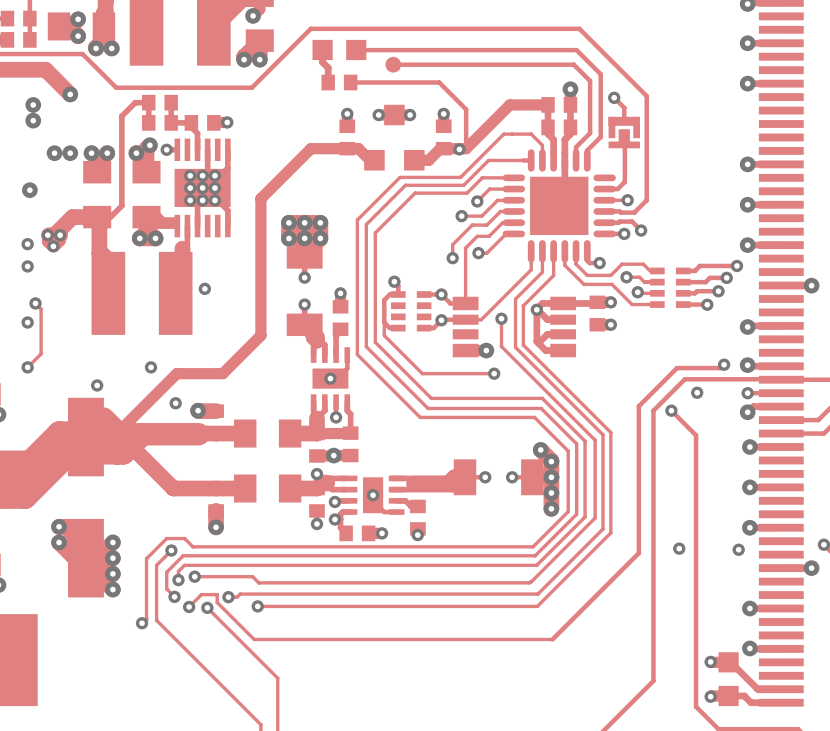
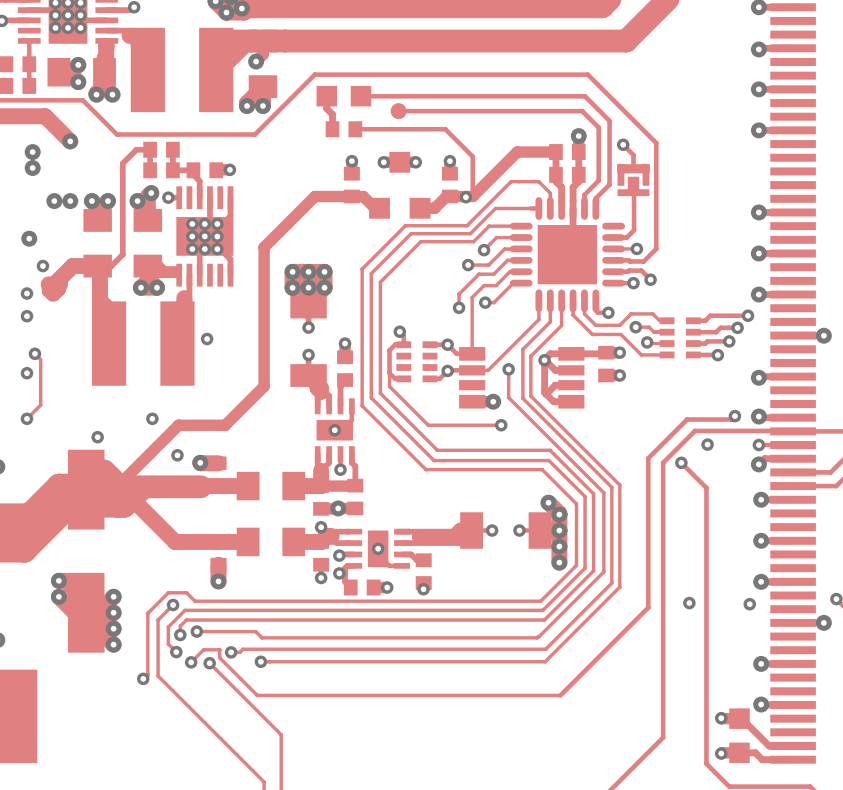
via: none -> (42, 266)
via: (47, 235) -> none
via: (60, 235) -> none
via: (53, 246) -> none

